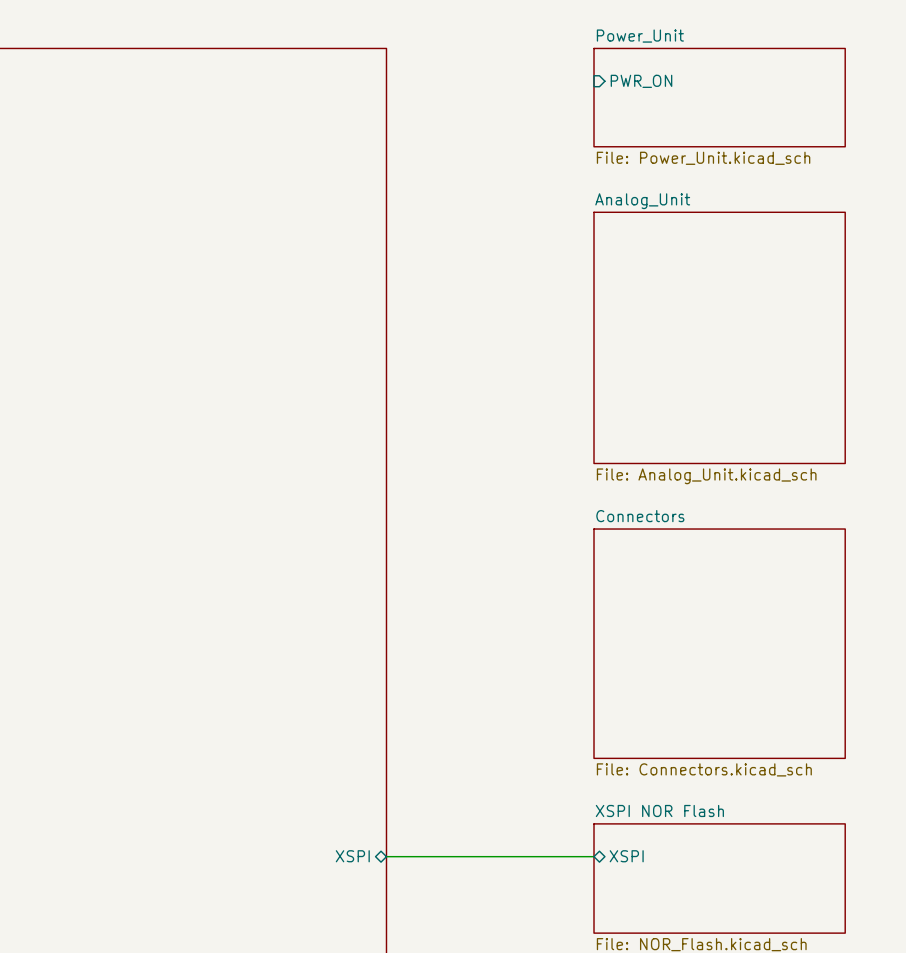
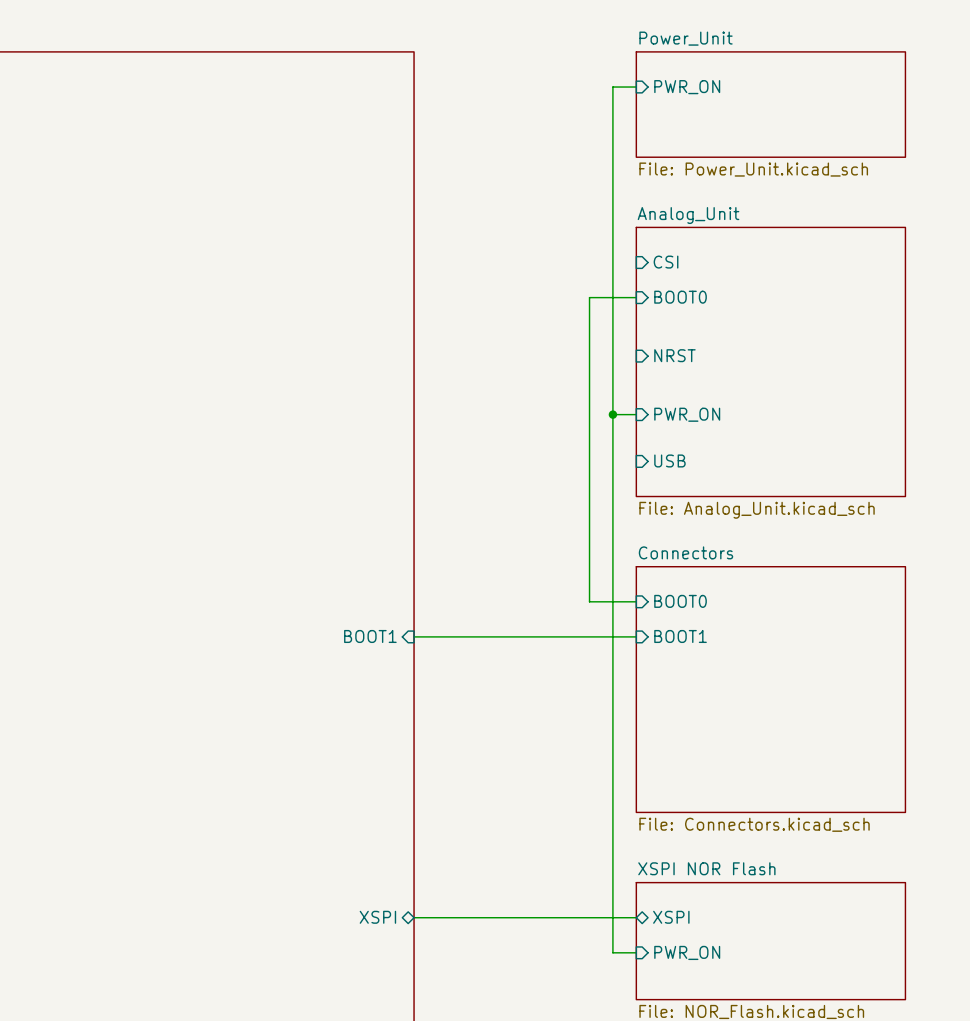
wire: none -> (636, 87) (612, 87) (612, 952) (636, 952)
sheet pin: none -> CSI (666, 262)
wire: none -> (636, 297) (589, 297) (589, 601) (636, 601)
sheet pin: none -> BOOT0 (680, 297)
sheet pin: none -> NRST (674, 355)
wire: none -> (612, 414) (636, 414)
junction: none -> (612, 414)
sheet pin: none -> PWR_ON (687, 414)
sheet pin: none -> USB (669, 460)
sheet pin: none -> BOOT0 (680, 601)
sheet pin: none -> BOOT1 (370, 636)
wire: none -> (414, 636) (636, 636)
sheet pin: none -> BOOT1 (680, 636)
sheet pin: none -> PWR_ON (687, 952)

